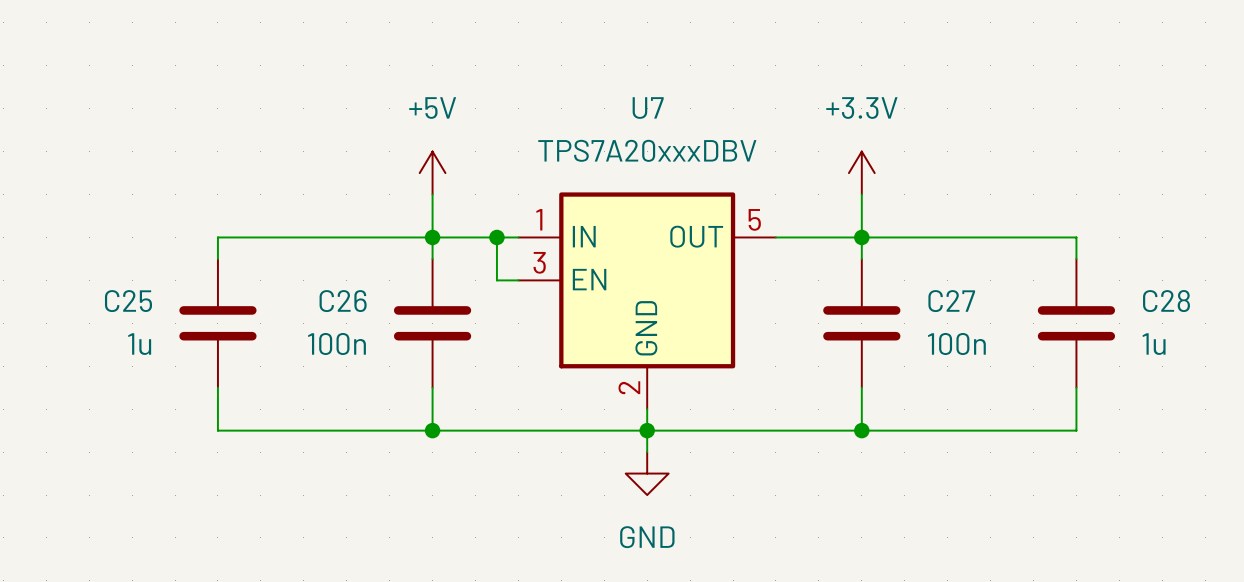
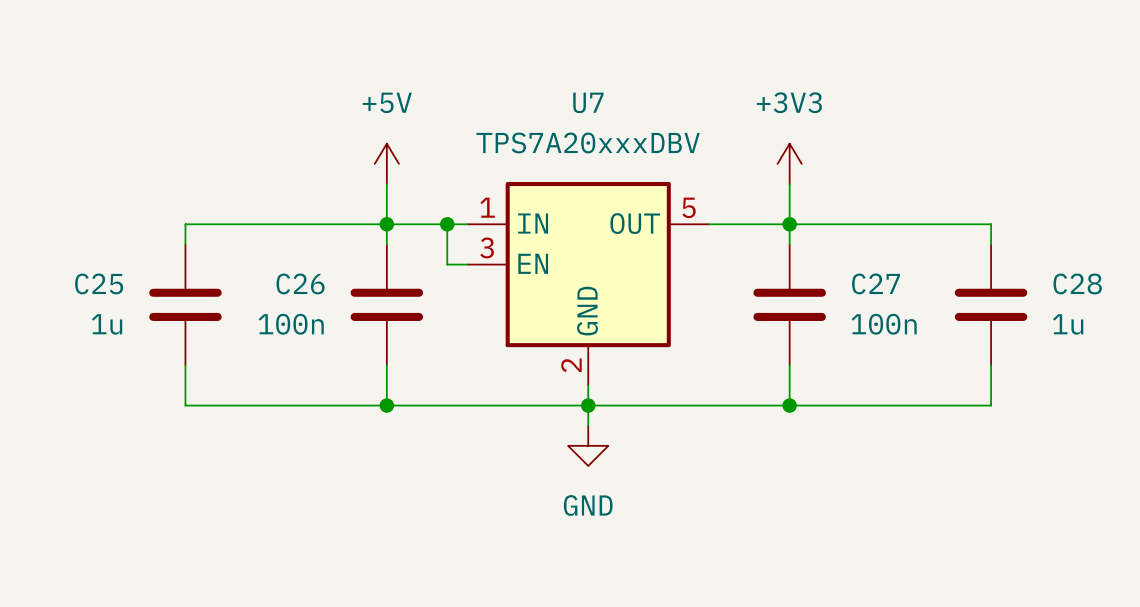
power symbol: +3.3V (861, 173) -> +3V3 (789, 163)

